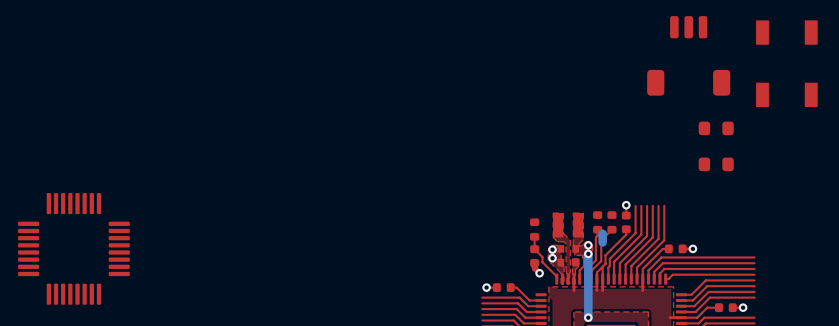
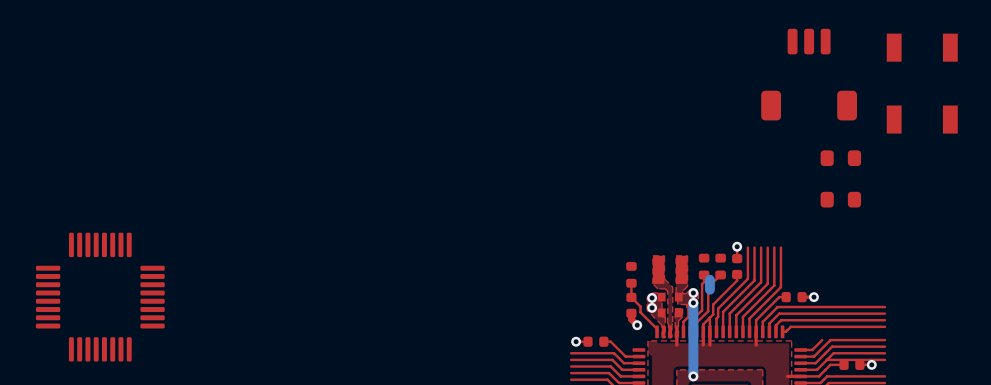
top track: (754, 280) (705, 280) (700, 286) -> none
top track: none -> (885, 359) (826, 359)

